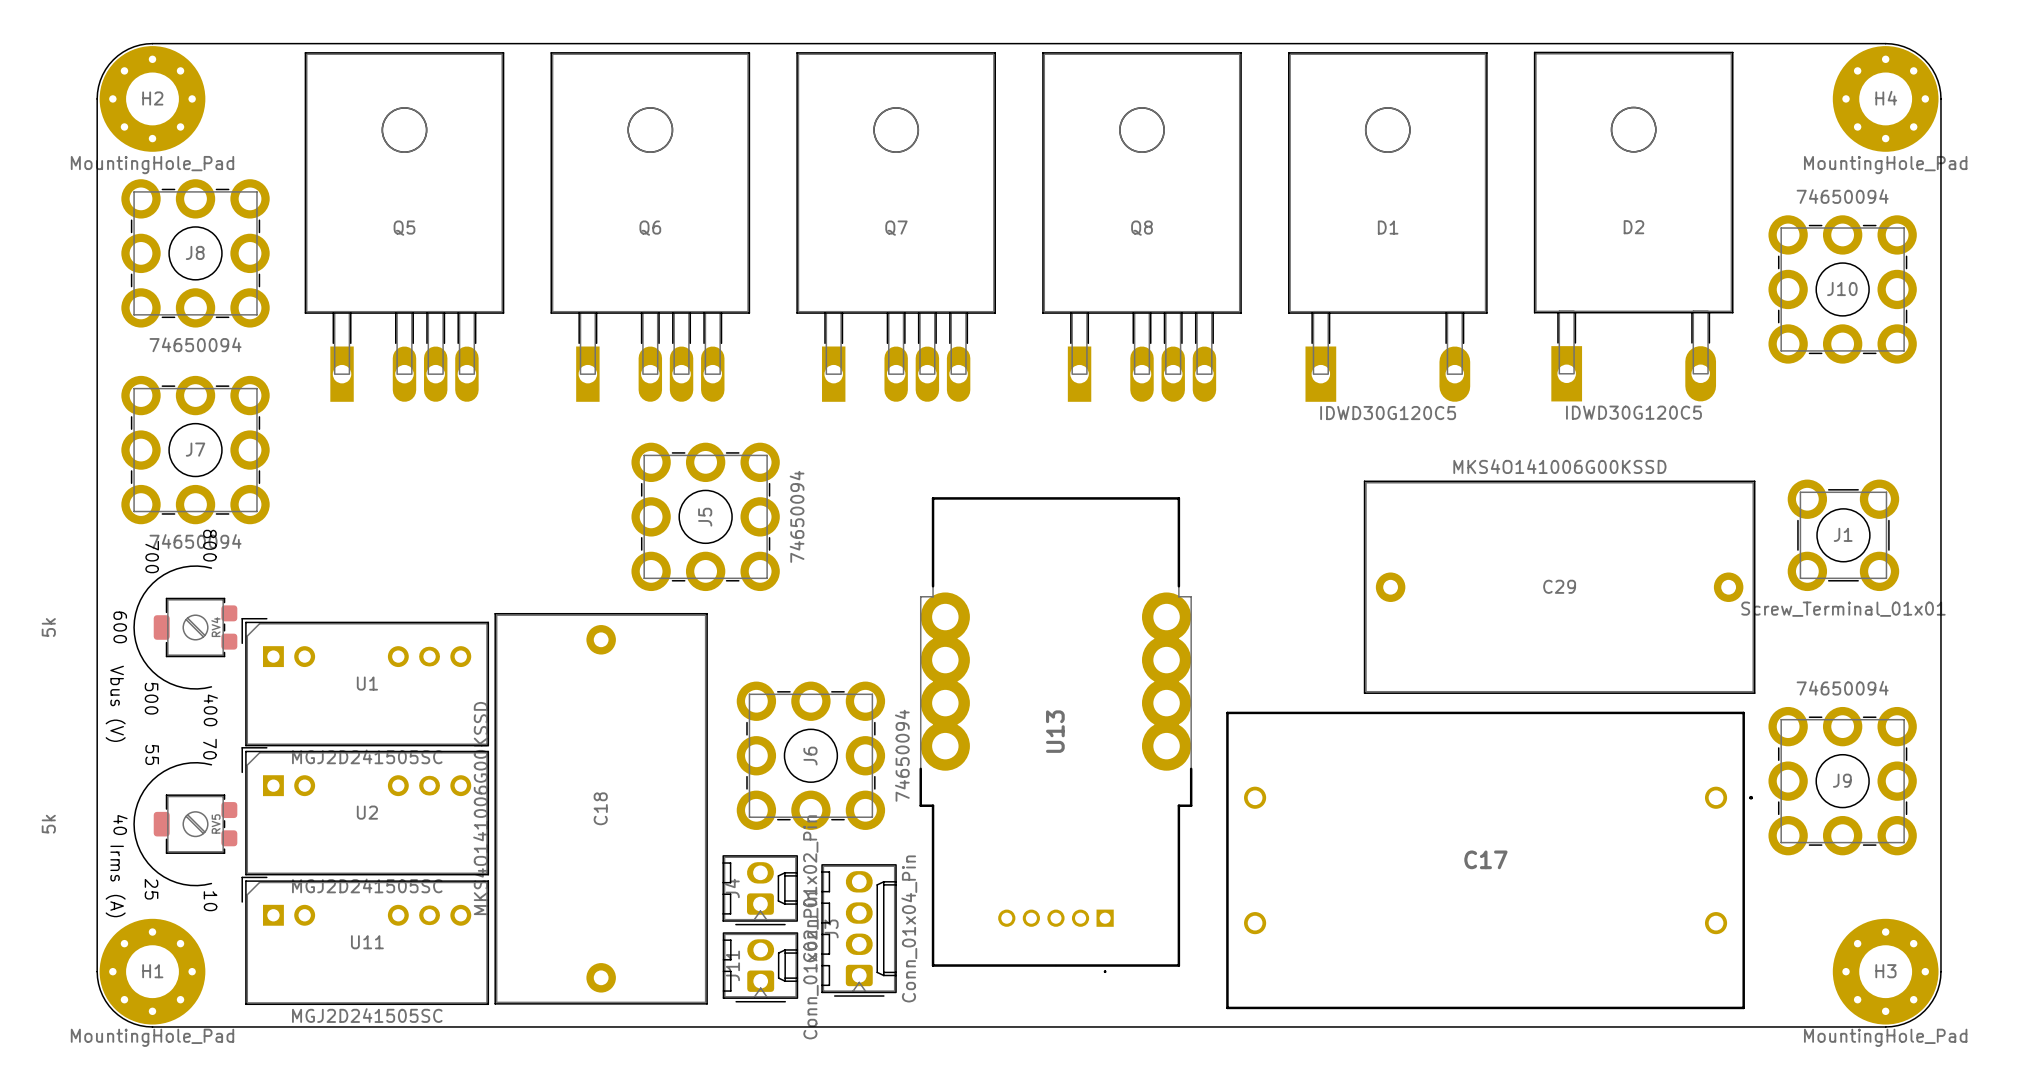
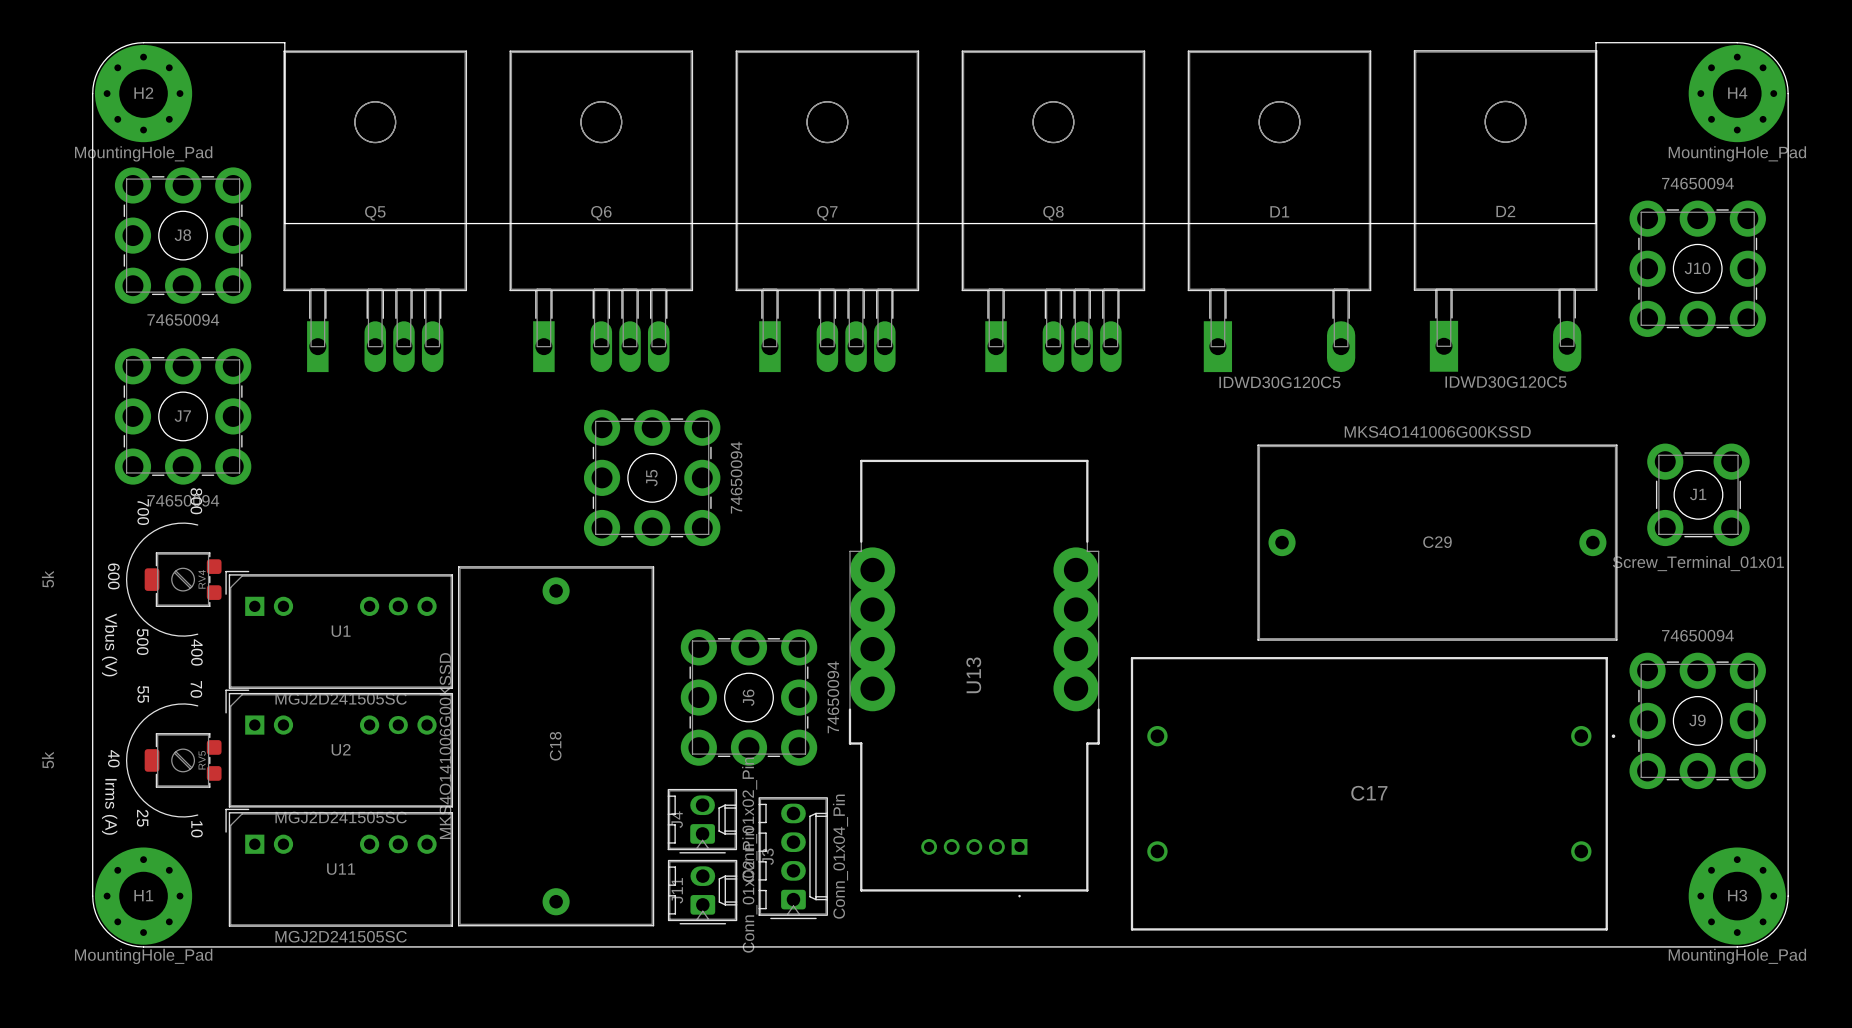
board edge: (306, 43) (1732, 43) -> (284, 42) (284, 223) (1595, 223) (1595, 42)

